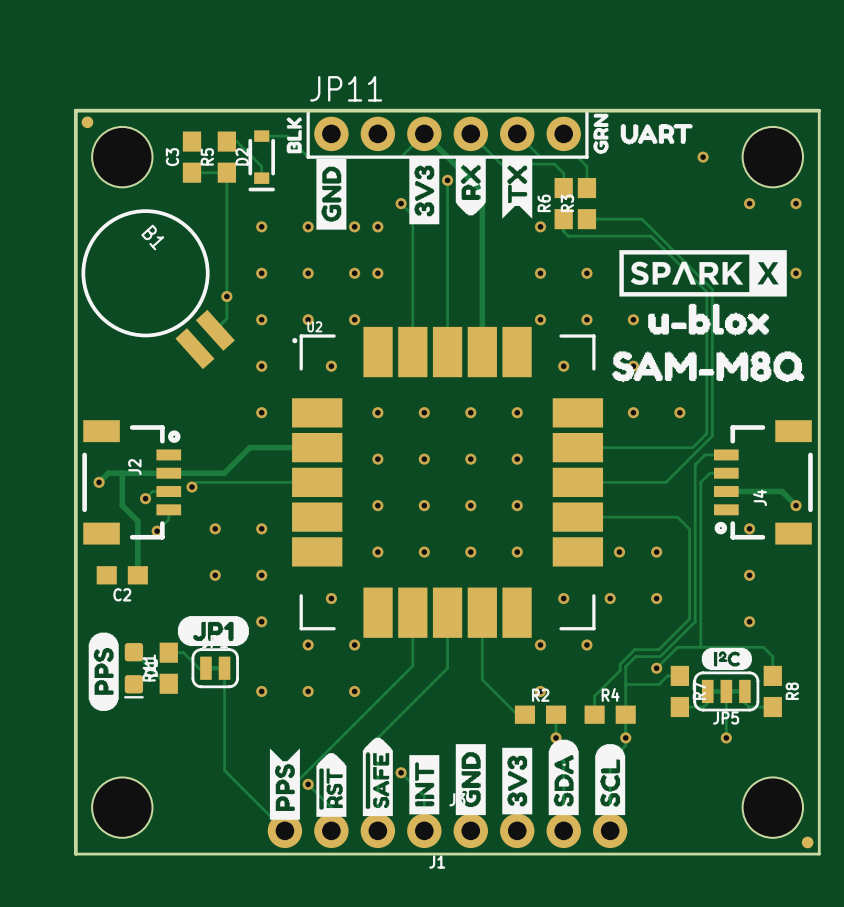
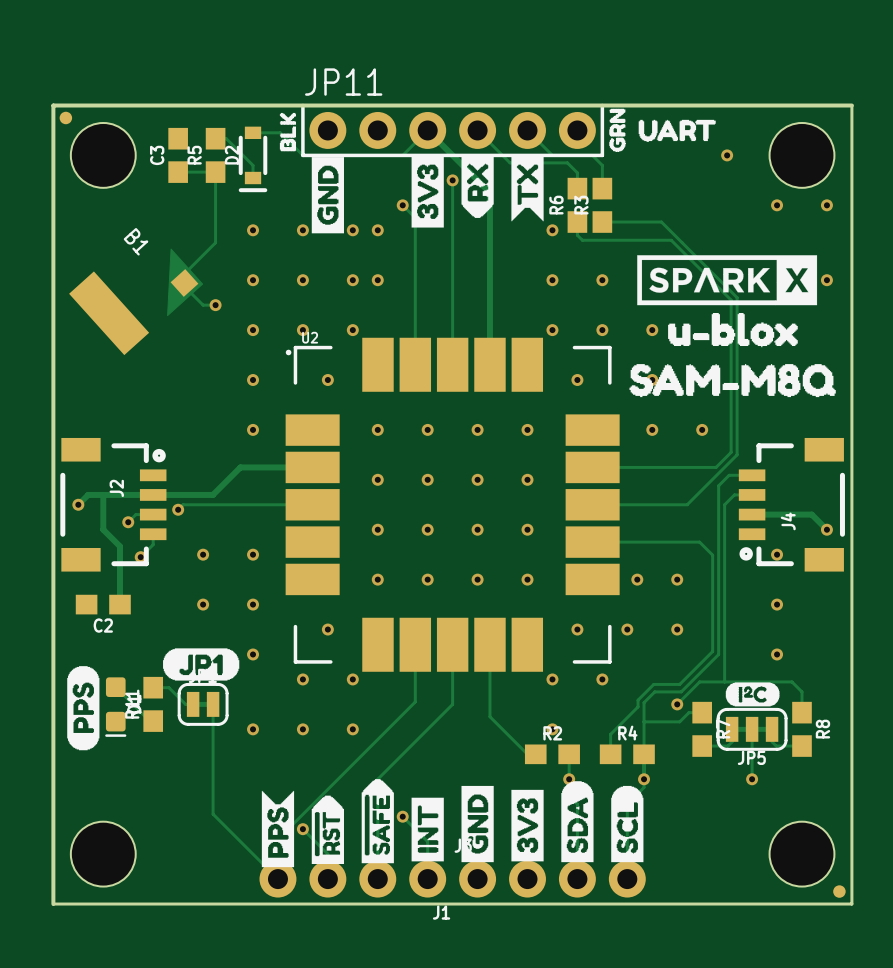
B1 footprint: [81, 209, 235, 370] -> [69, 248, 204, 356]
track: (226, 238) (226, 318) (215, 330) -> (215, 242) (184, 273) (184, 286) (203, 305) (215, 305)

